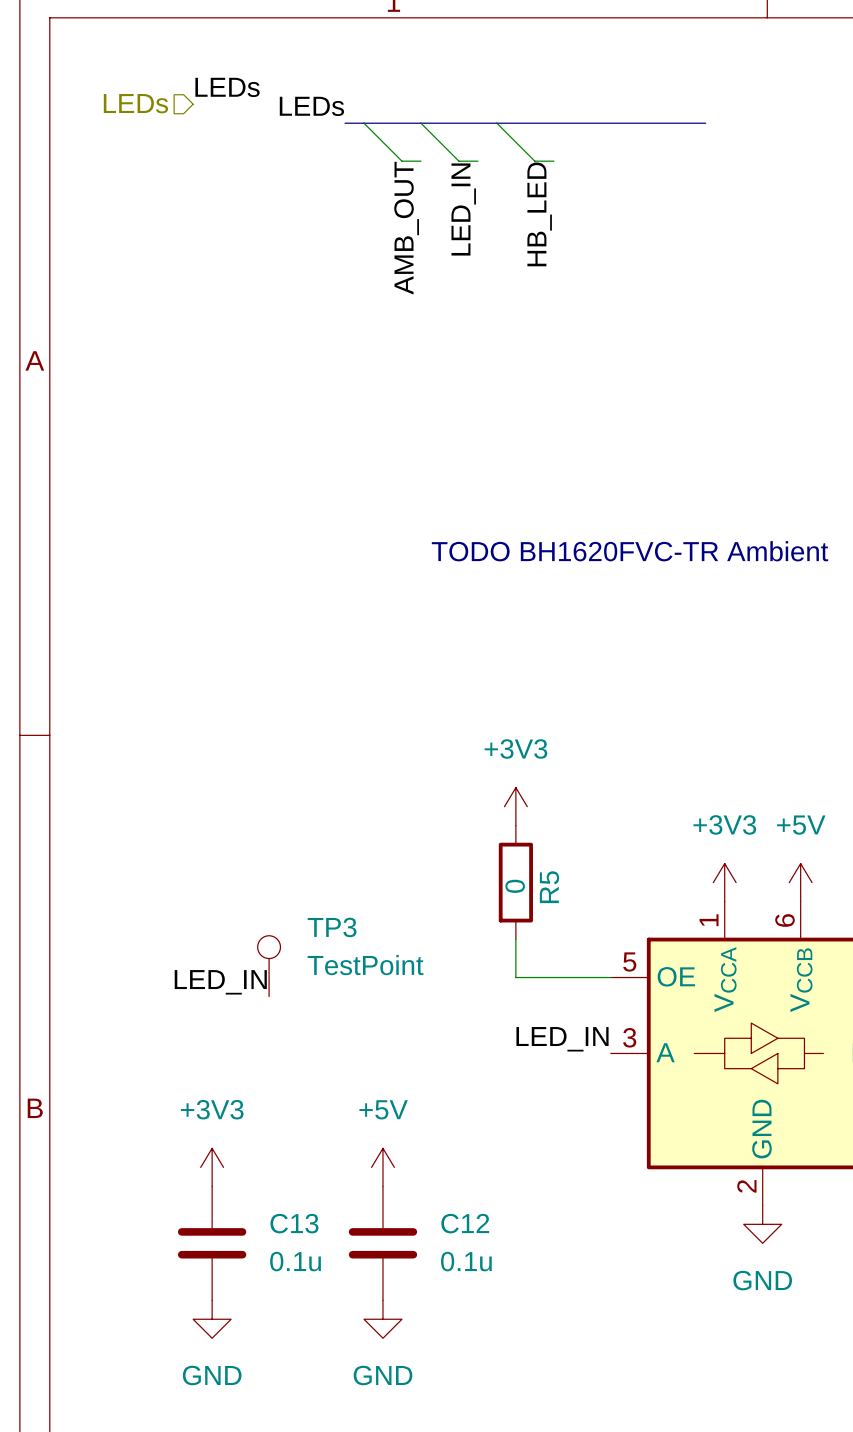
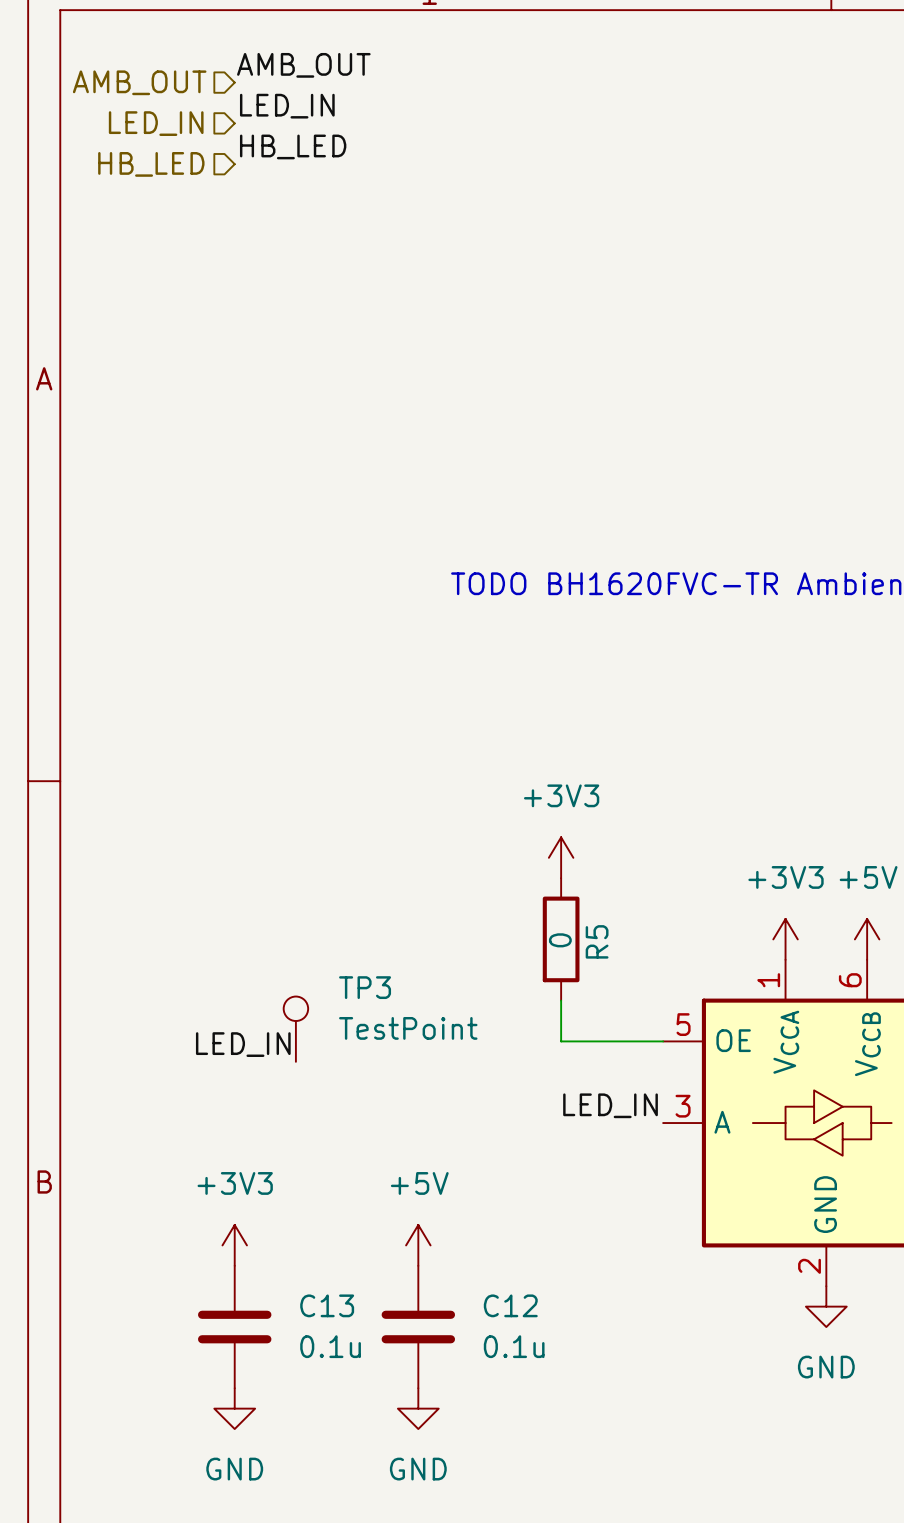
hierarchical label: none -> AMB_OUT (139, 82)
label: LEDs (227, 87) -> none
hierarchical label: LEDs (135, 103) -> none
label: LEDs (311, 106) -> none
bus: (345, 123) (705, 123) -> none
wire: (364, 123) (401, 161) (420, 161) -> none
wire: (420, 123) (458, 161) (477, 161) -> none
wire: (496, 123) (534, 161) (553, 161) -> none
hierarchical label: none -> LED_IN (156, 123)
hierarchical label: none -> HB_LED (151, 164)
label rotation: 0° (463, 209) -> 90° clockwise (287, 106)
label position: LED_IN (463, 209) -> LED_IN (287, 106)
label rotation: 0° (539, 214) -> 90° clockwise (293, 146)
label position: HB_LED (539, 214) -> HB_LED (293, 146)
label rotation: 0° (406, 228) -> 90° clockwise (303, 65)
label position: AMB_OUT (406, 228) -> AMB_OUT (303, 65)

